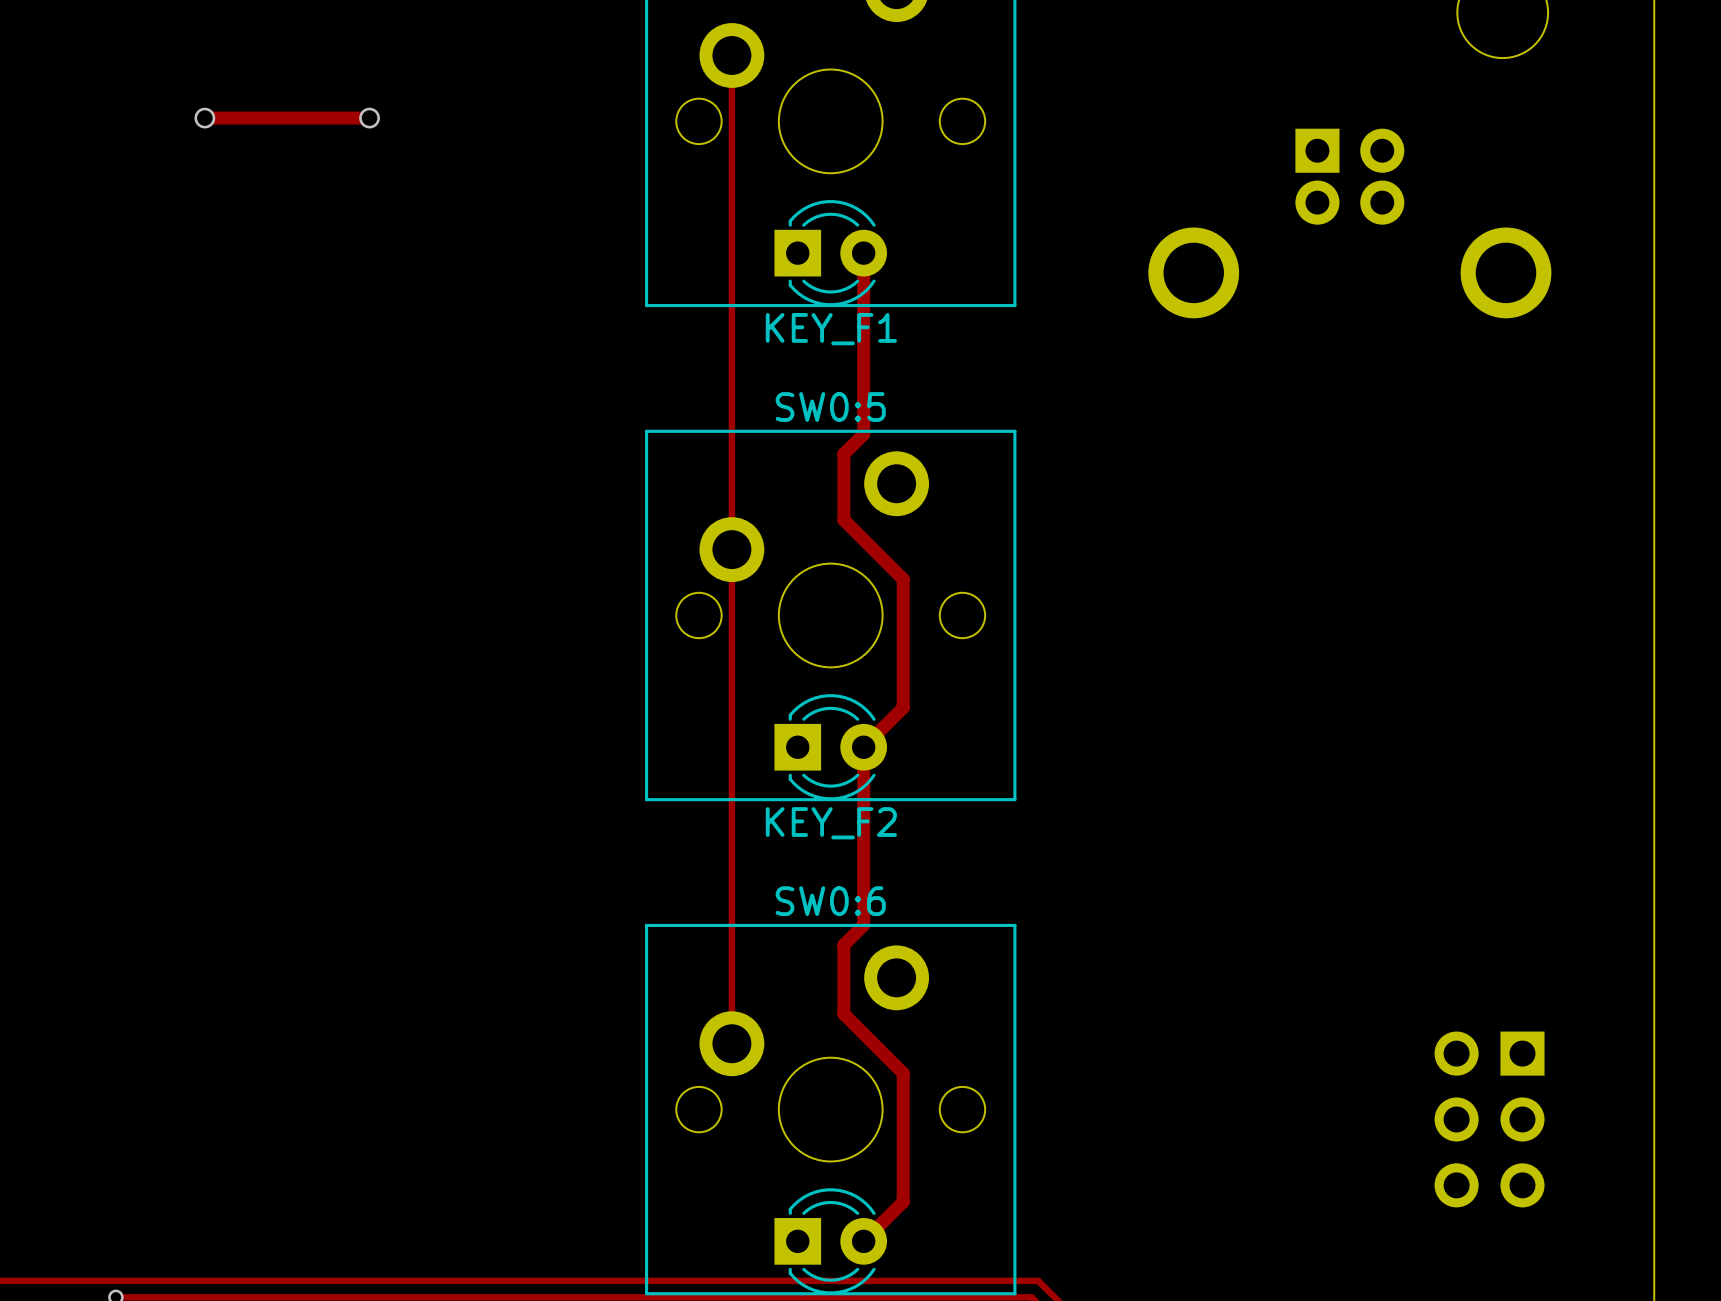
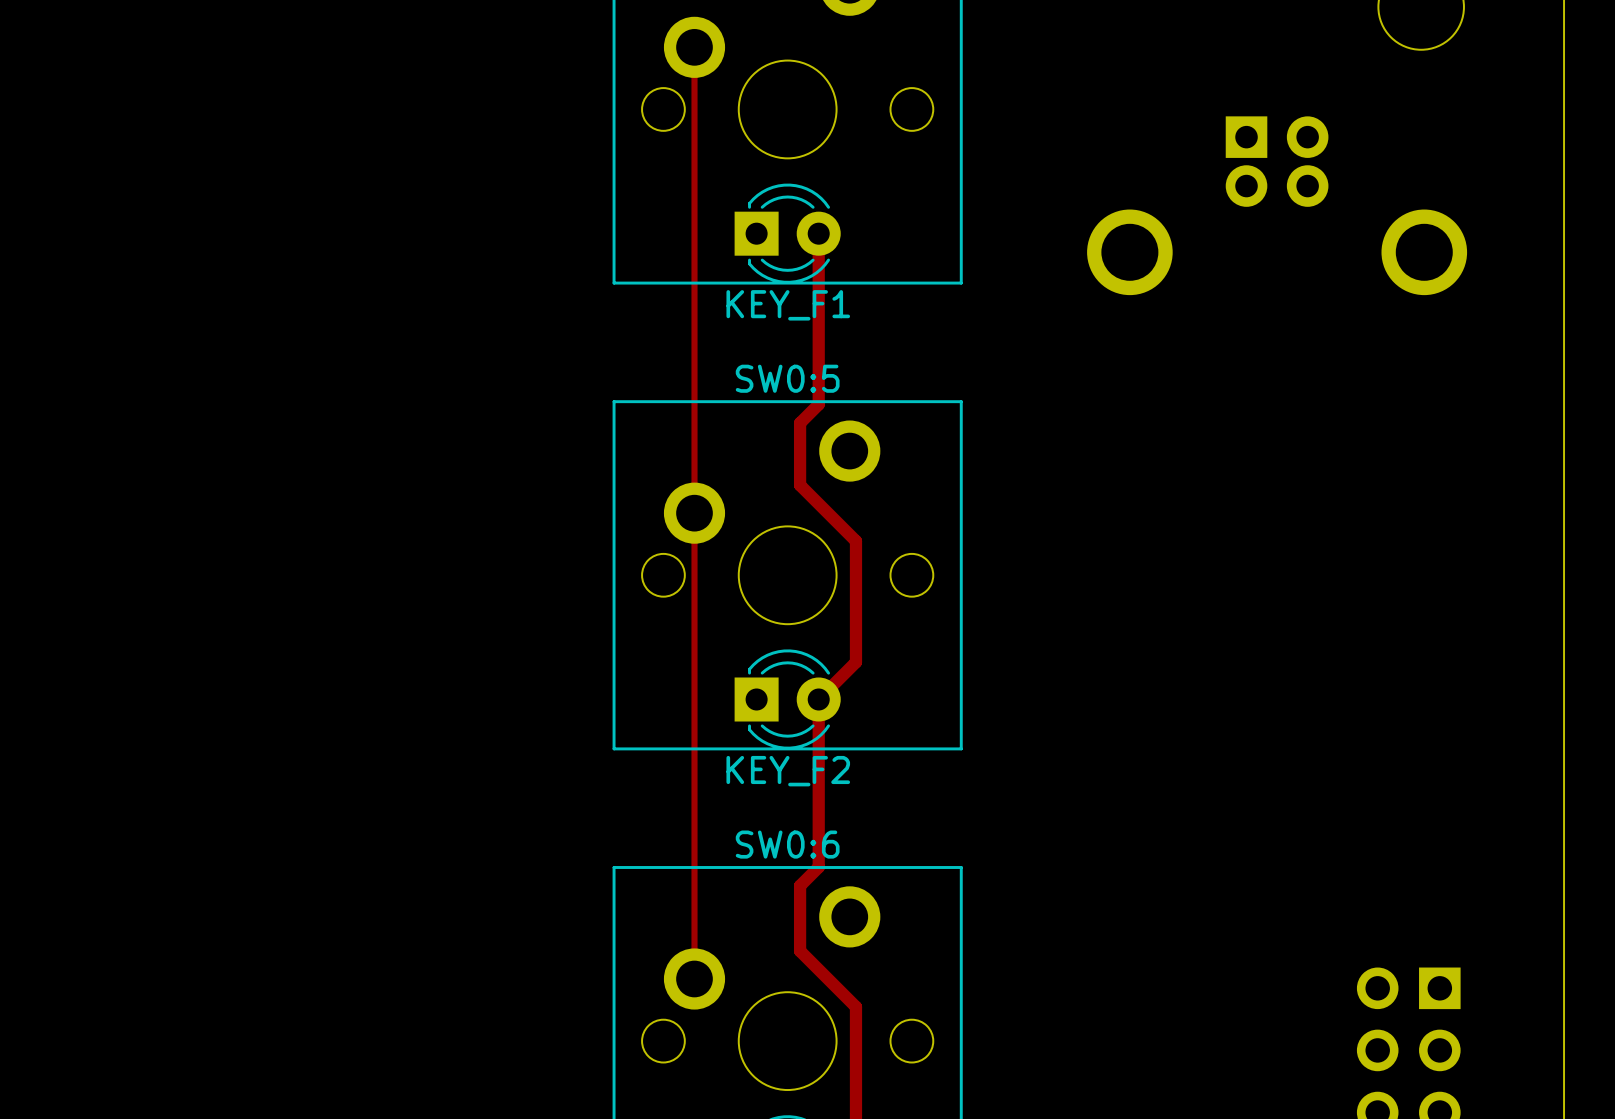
track: (204, 118) (369, 118) -> none
via: (204, 118) -> none
via: (369, 118) -> none

